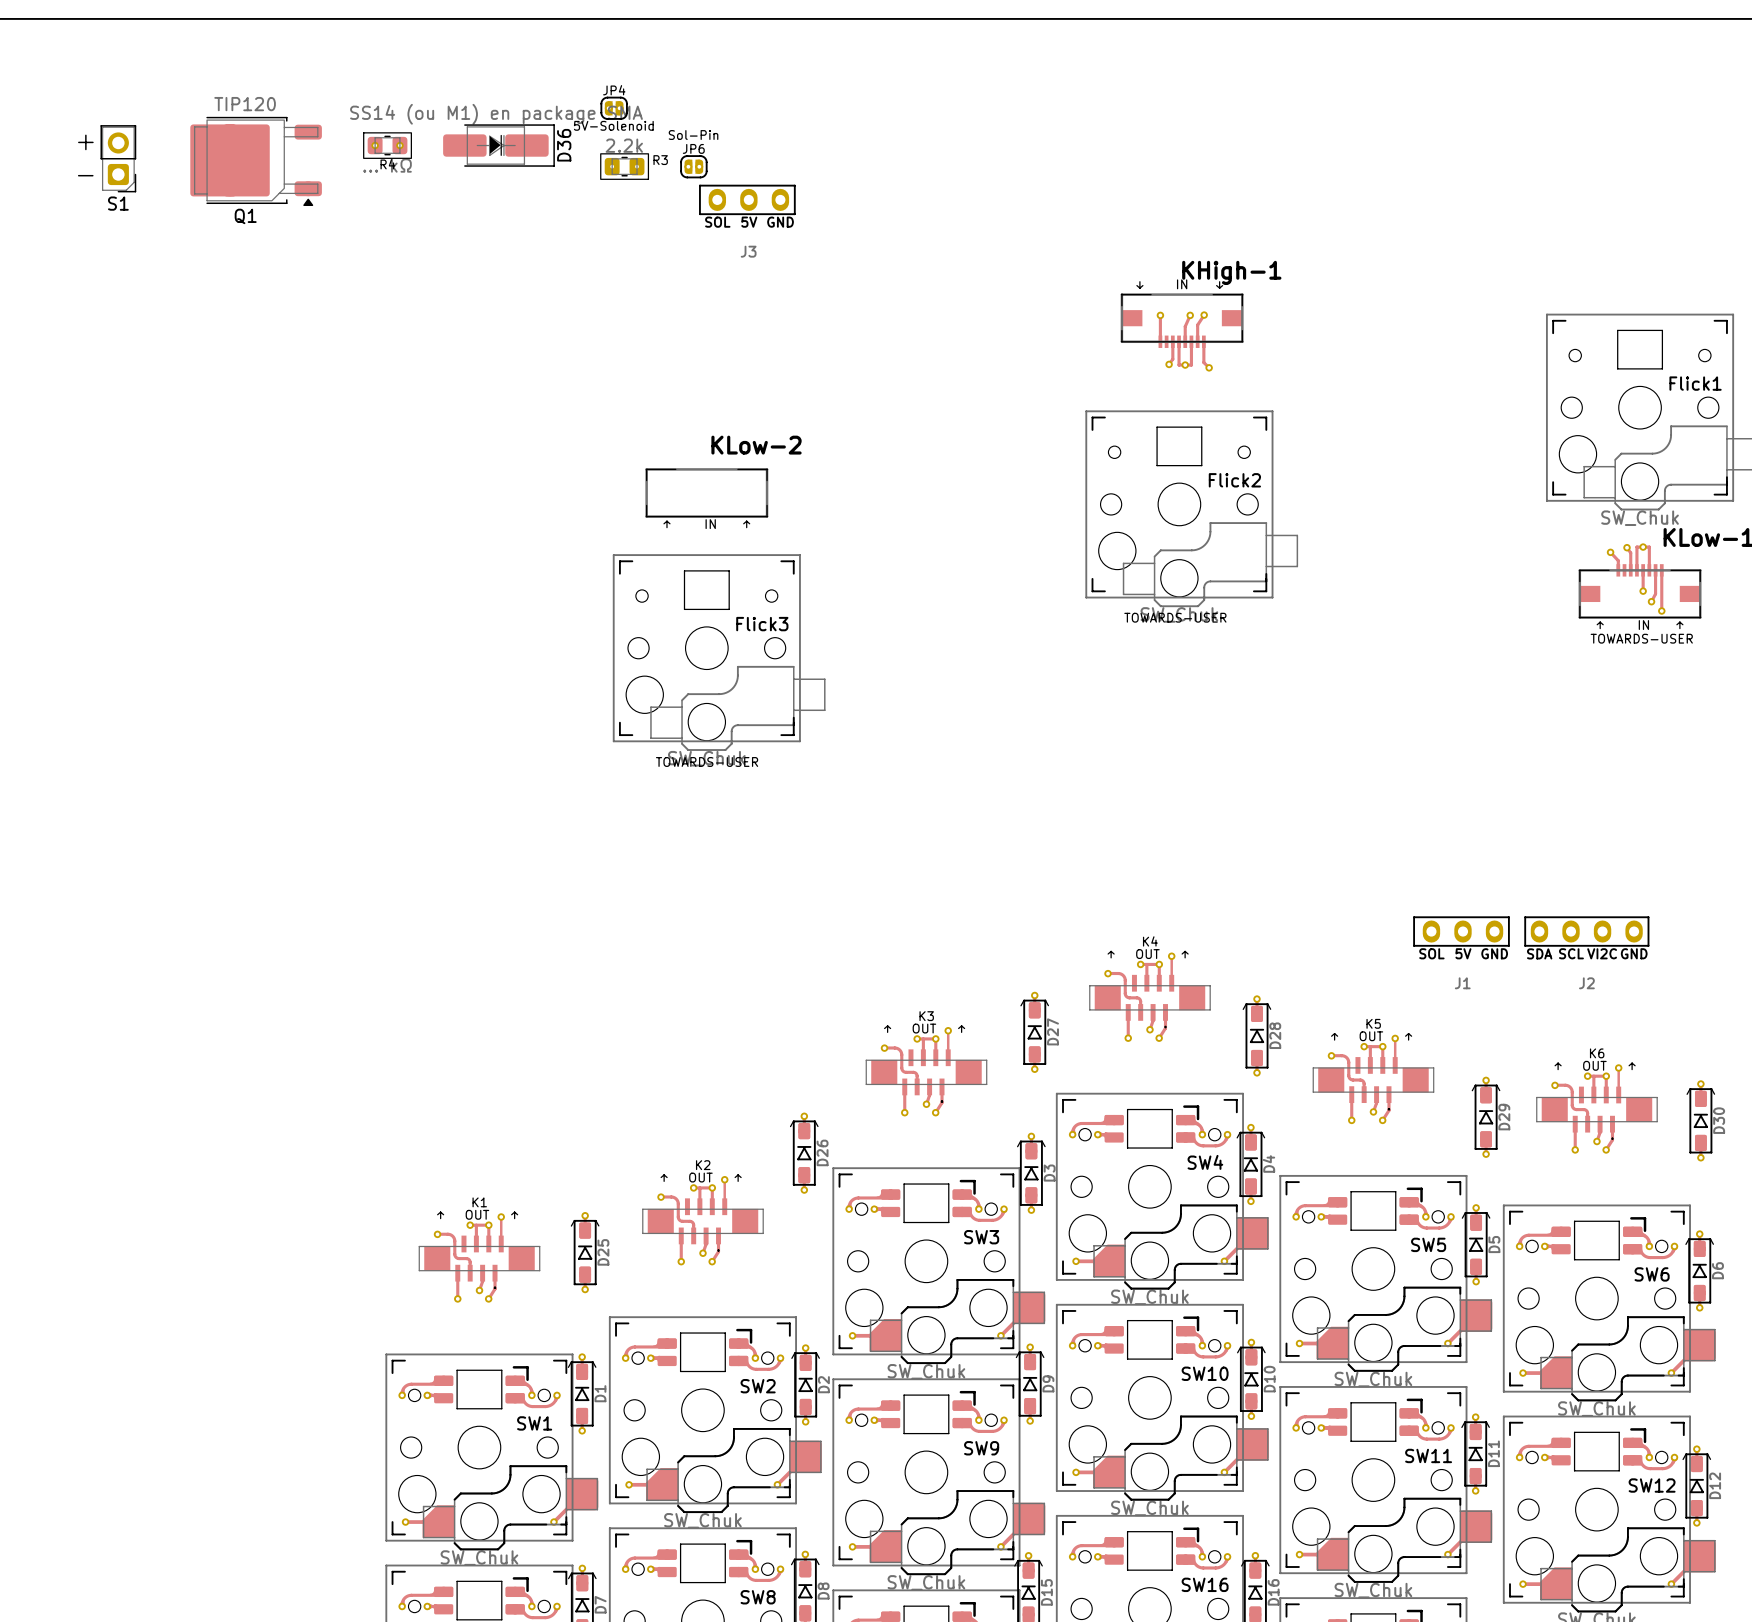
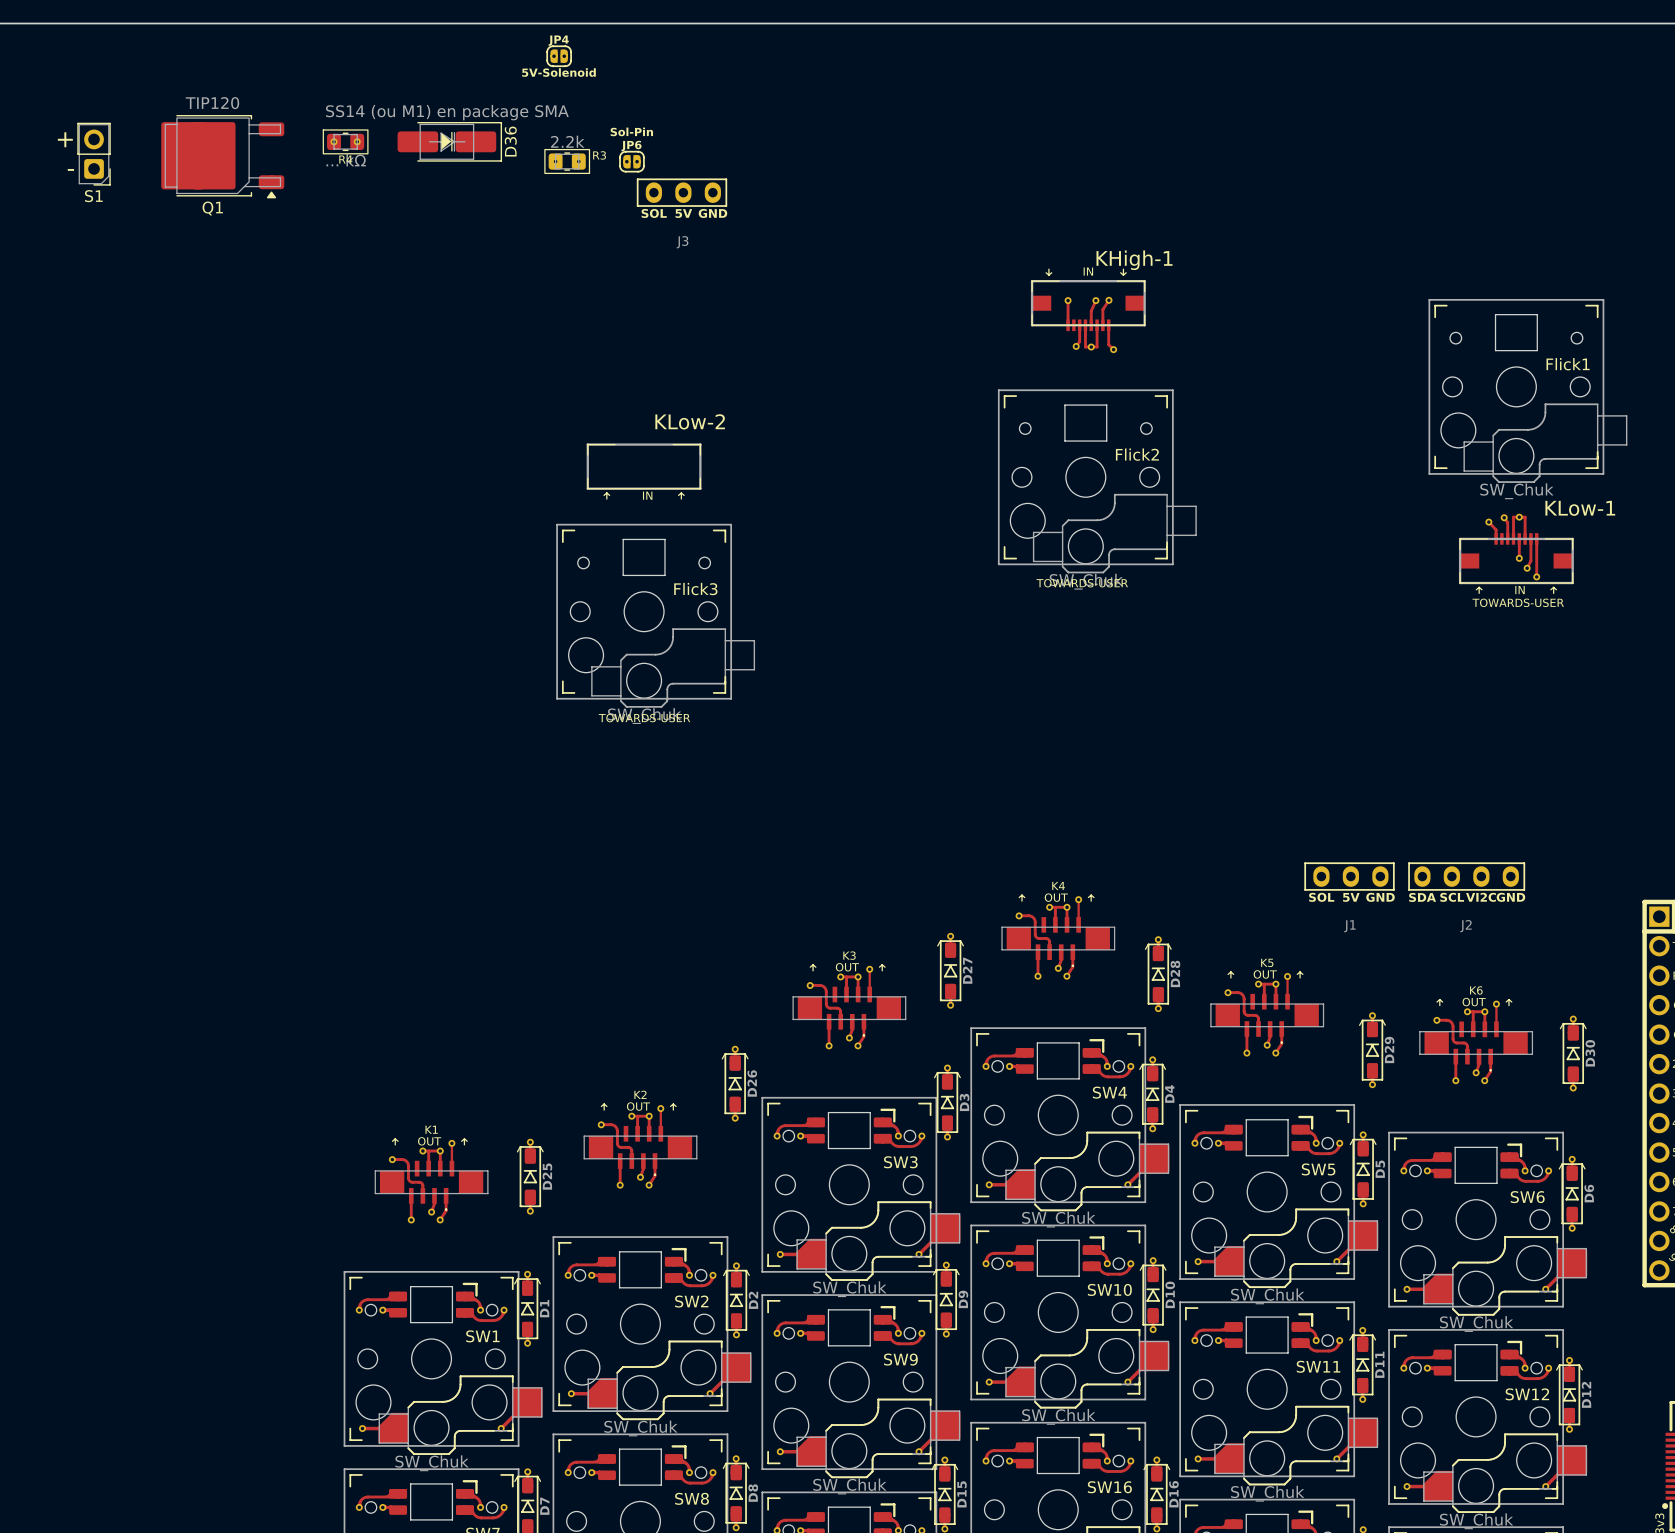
JP4 position: (614, 108) -> (559, 56)

